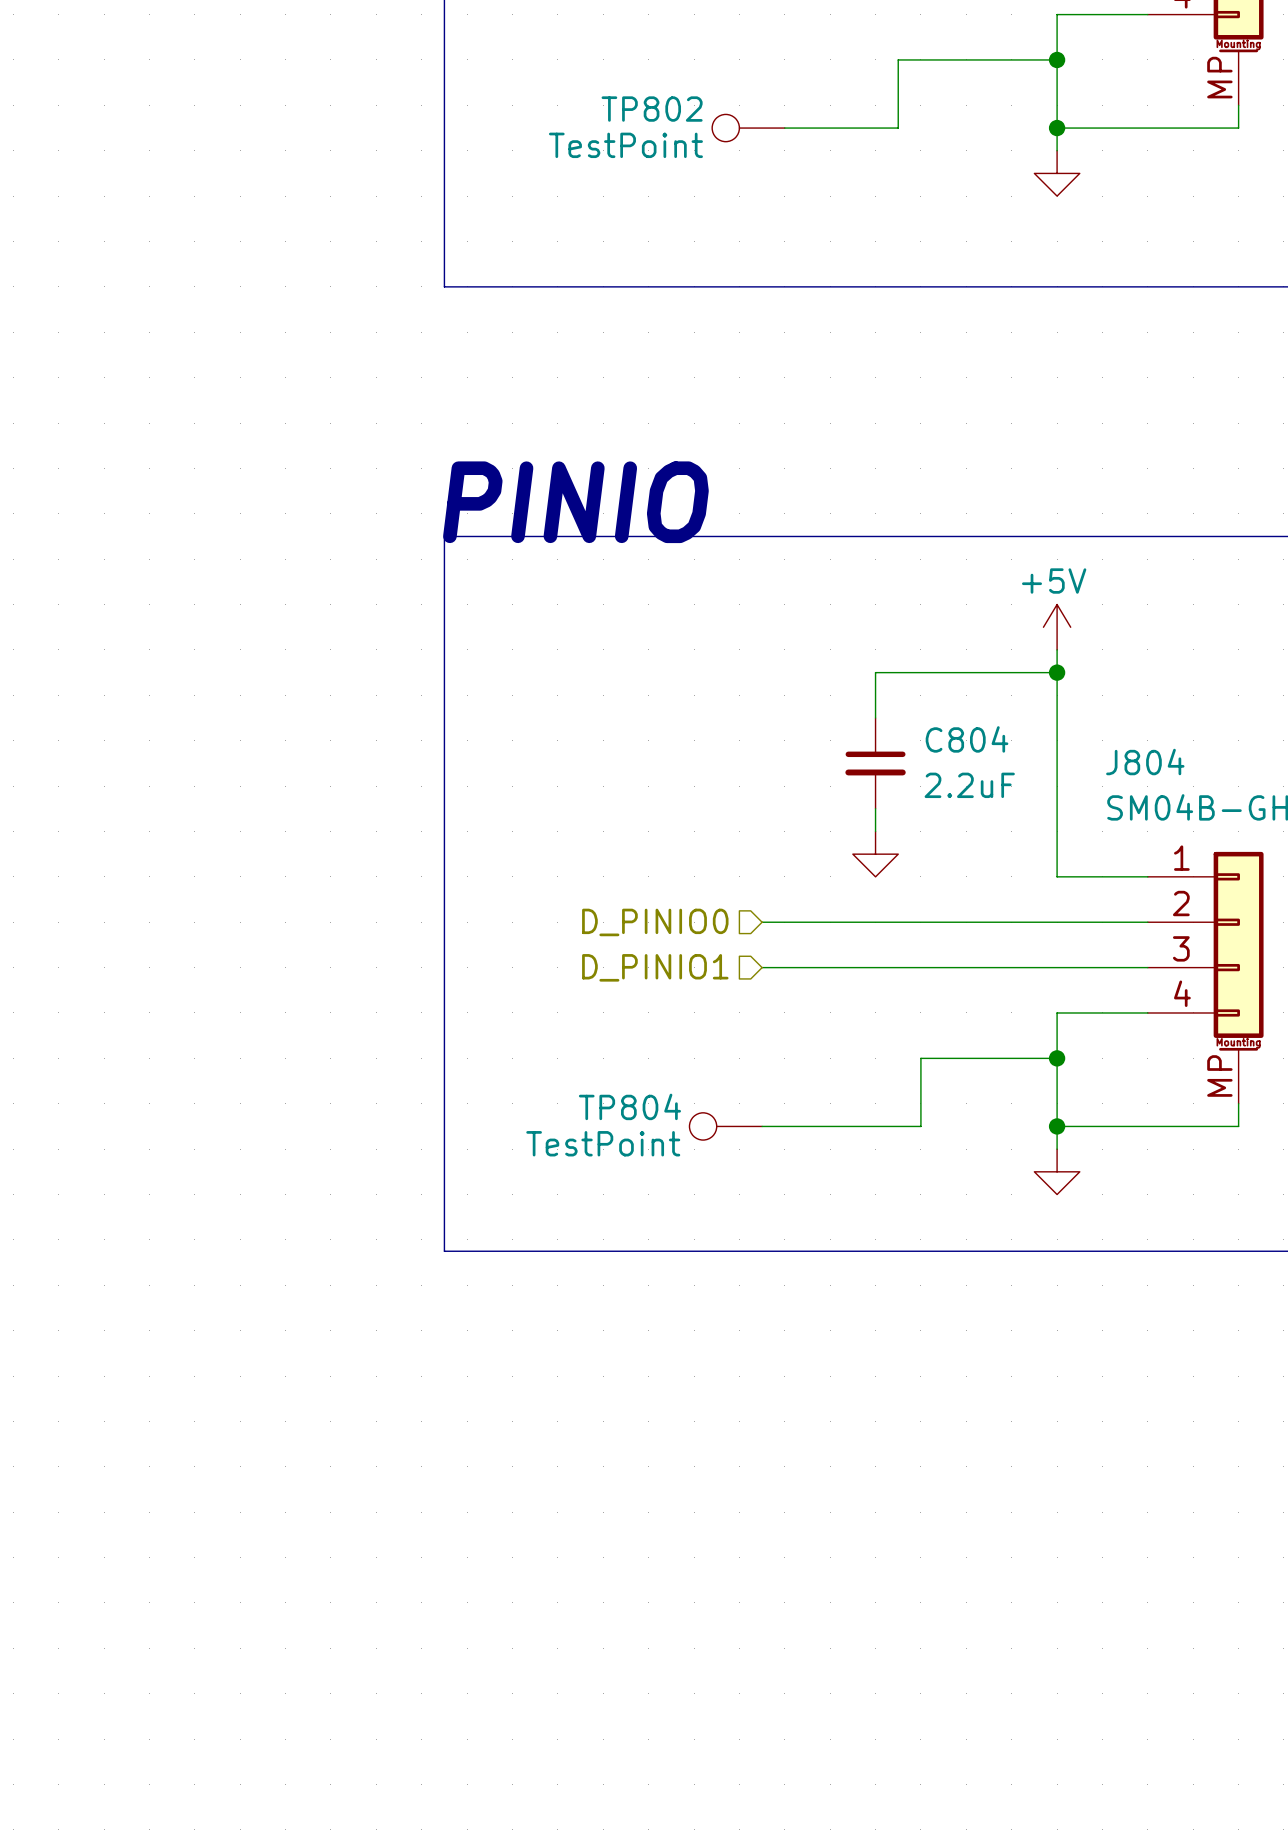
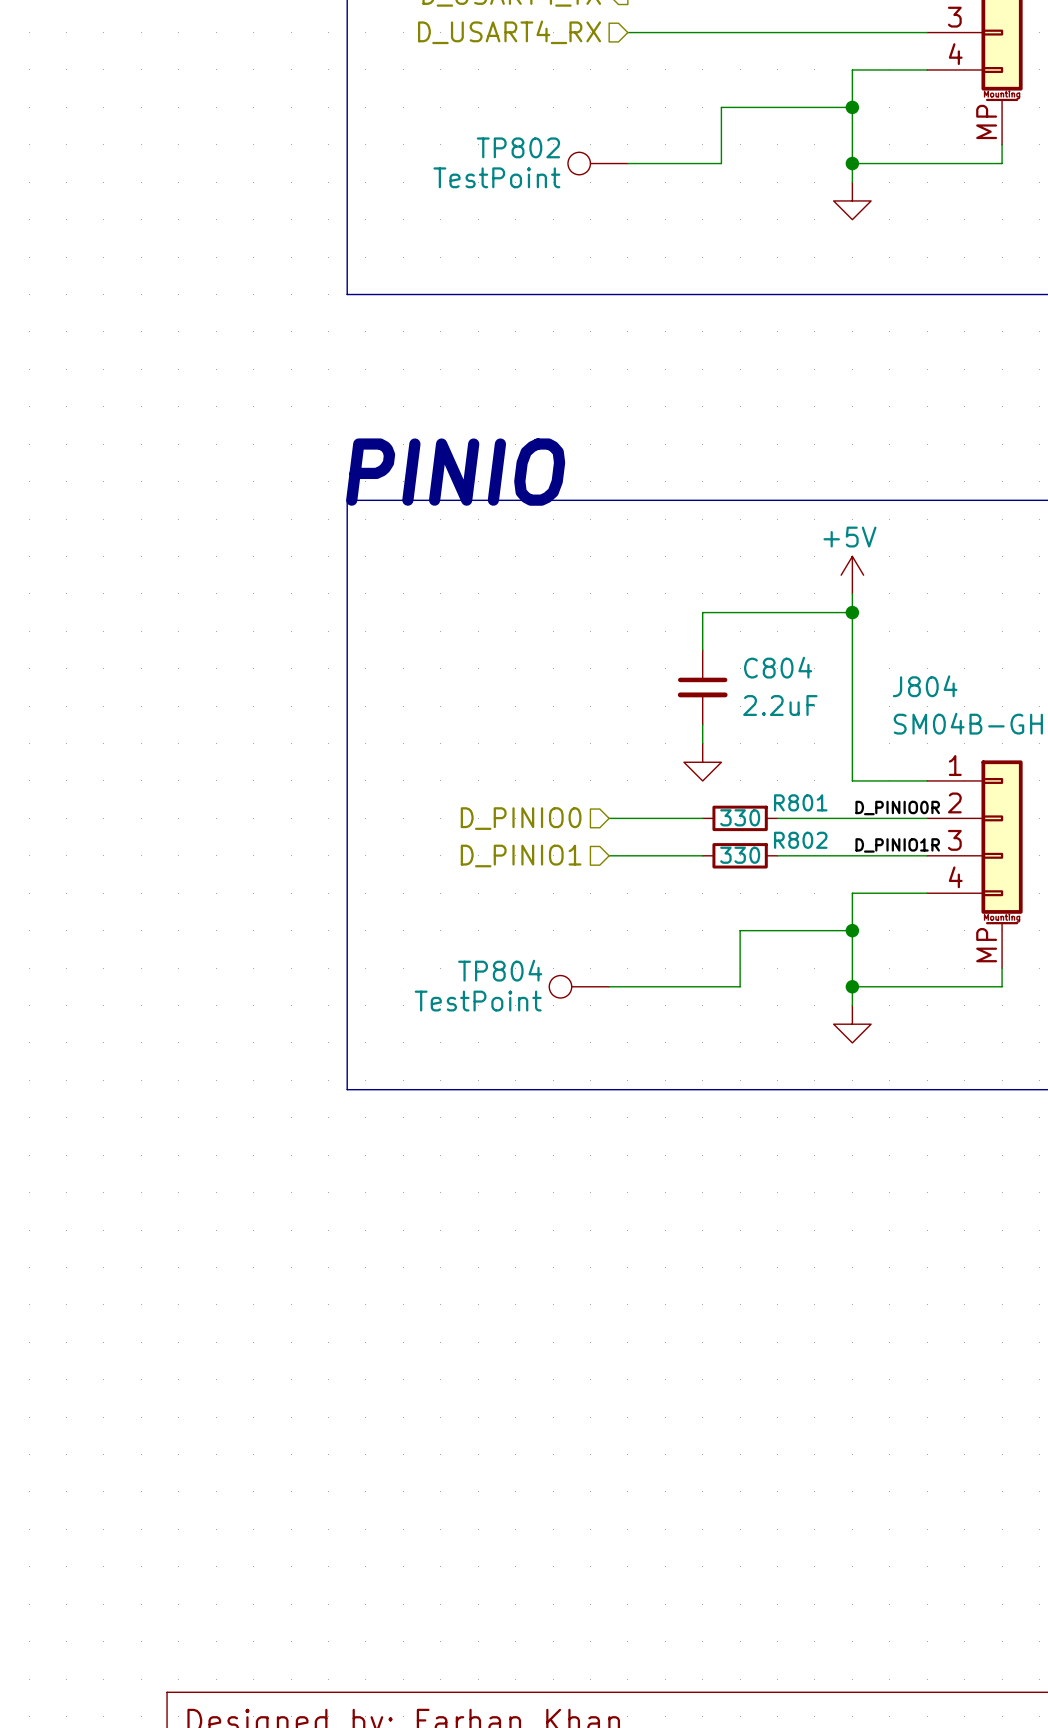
label: none -> D_PINIO0R (897, 808)
wire: (875, 922) (966, 922) -> none
R801: none -> 330 (740, 818)
label: none -> D_PINIO1R (897, 845)
wire: (875, 967) (966, 967) -> none
R802: none -> 330 (740, 855)

